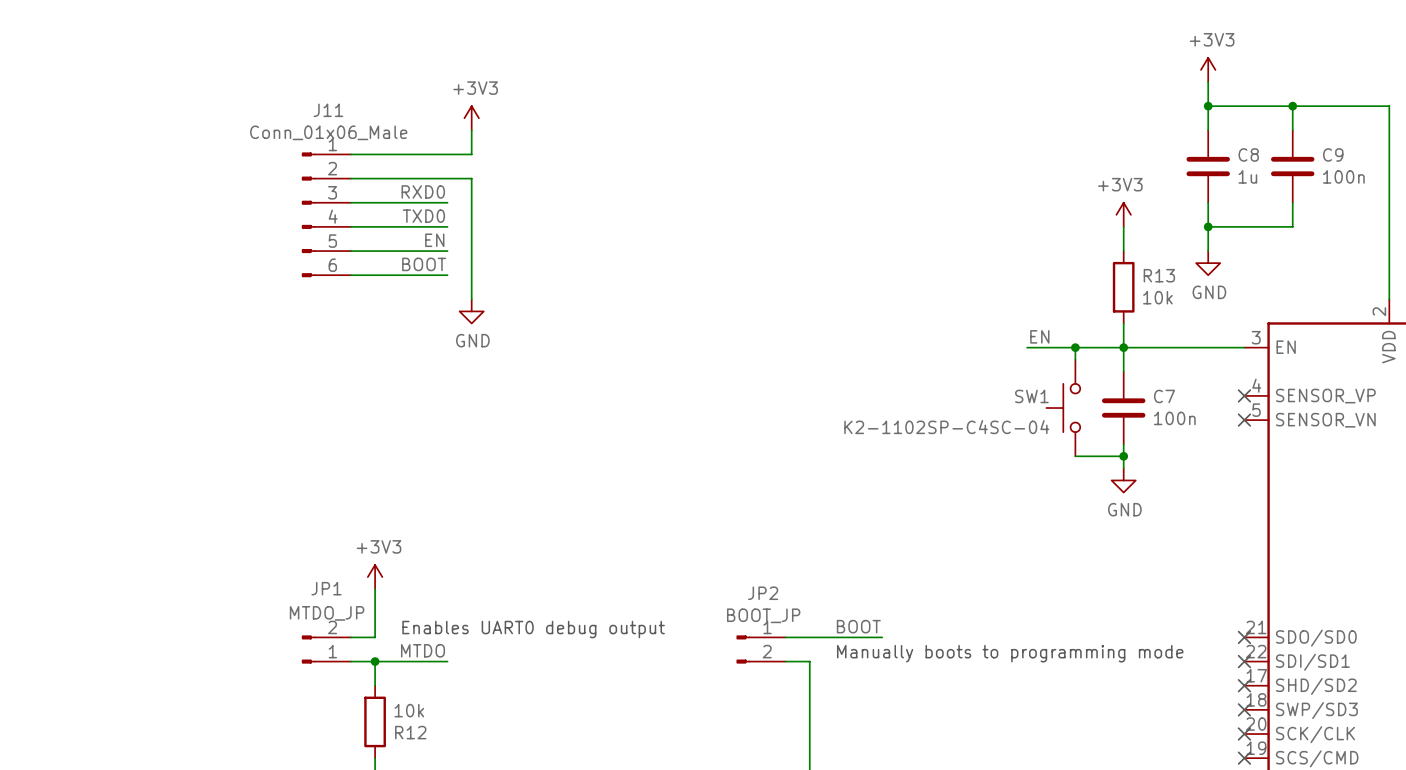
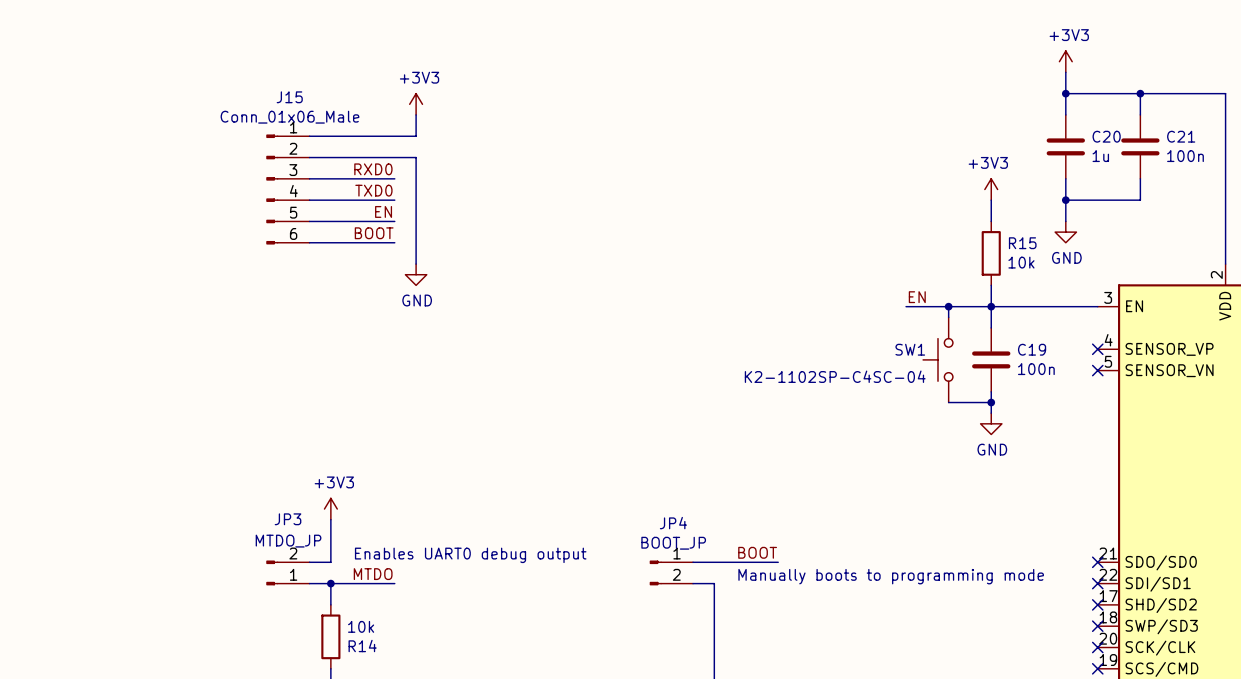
J11 name: J11 (328, 110) -> J15 (289, 97)
C8 name: C8 (1248, 154) -> C20 (1106, 136)
C9 name: C9 (1333, 154) -> C21 (1181, 136)
R13 name: R13 (1159, 275) -> R15 (1022, 243)
C7 name: C7 (1164, 396) -> C19 (1032, 349)
JP1 name: JP1 (326, 588) -> JP3 (288, 519)
JP2 name: JP2 (763, 593) -> JP4 (673, 523)
R12 name: R12 (410, 732) -> R14 (362, 646)

